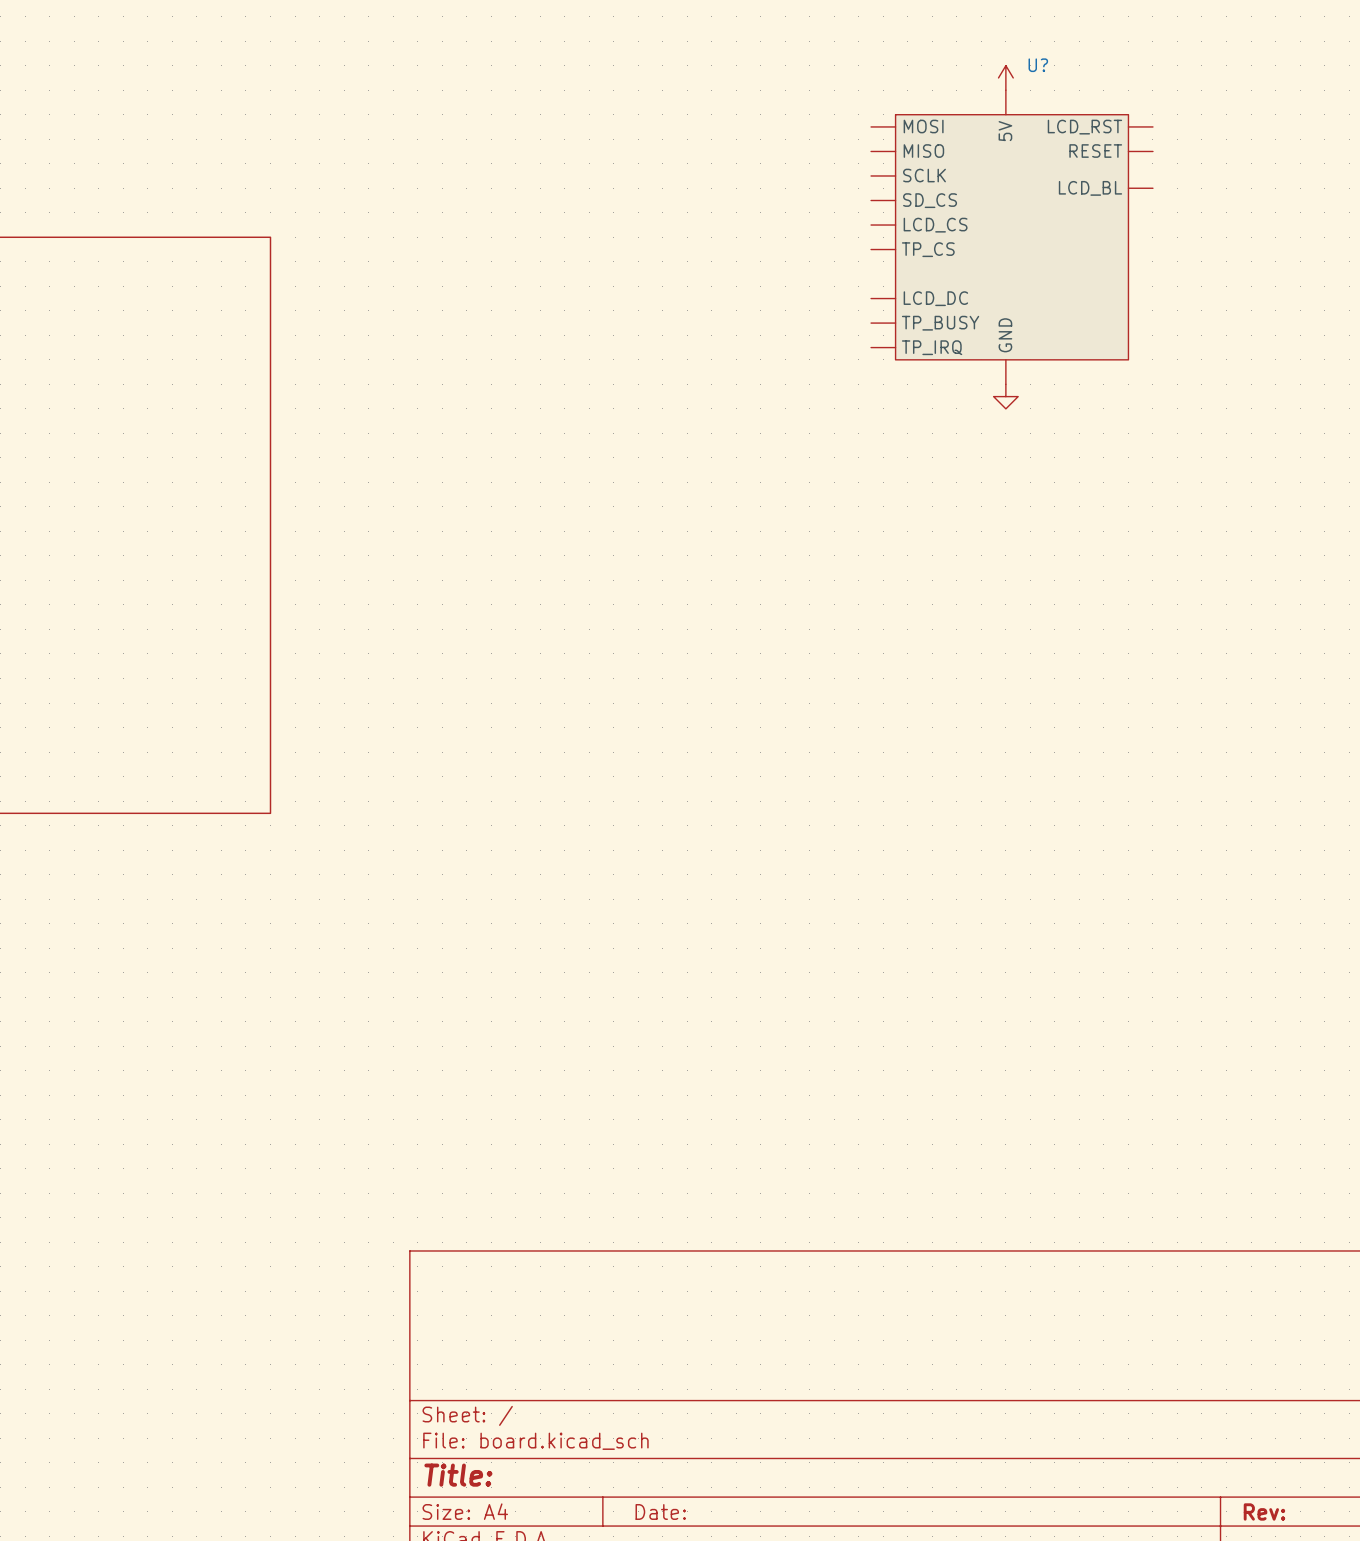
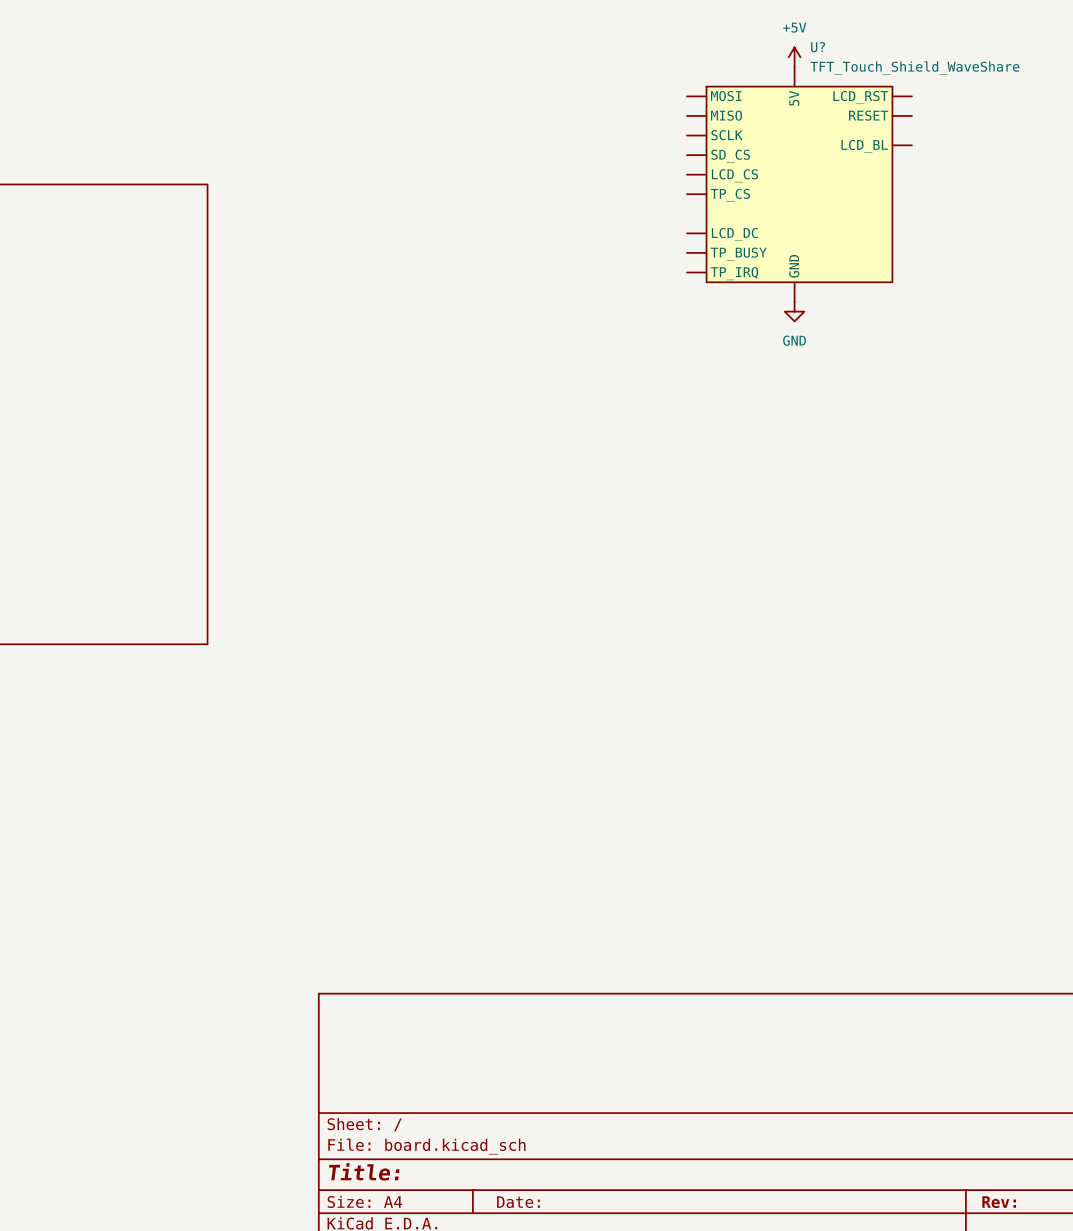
power symbol text: none -> +5V (794, 27)
U? value: none -> TFT_Touch_Shield_WaveShare (914, 68)
power symbol text: none -> GND (794, 340)

